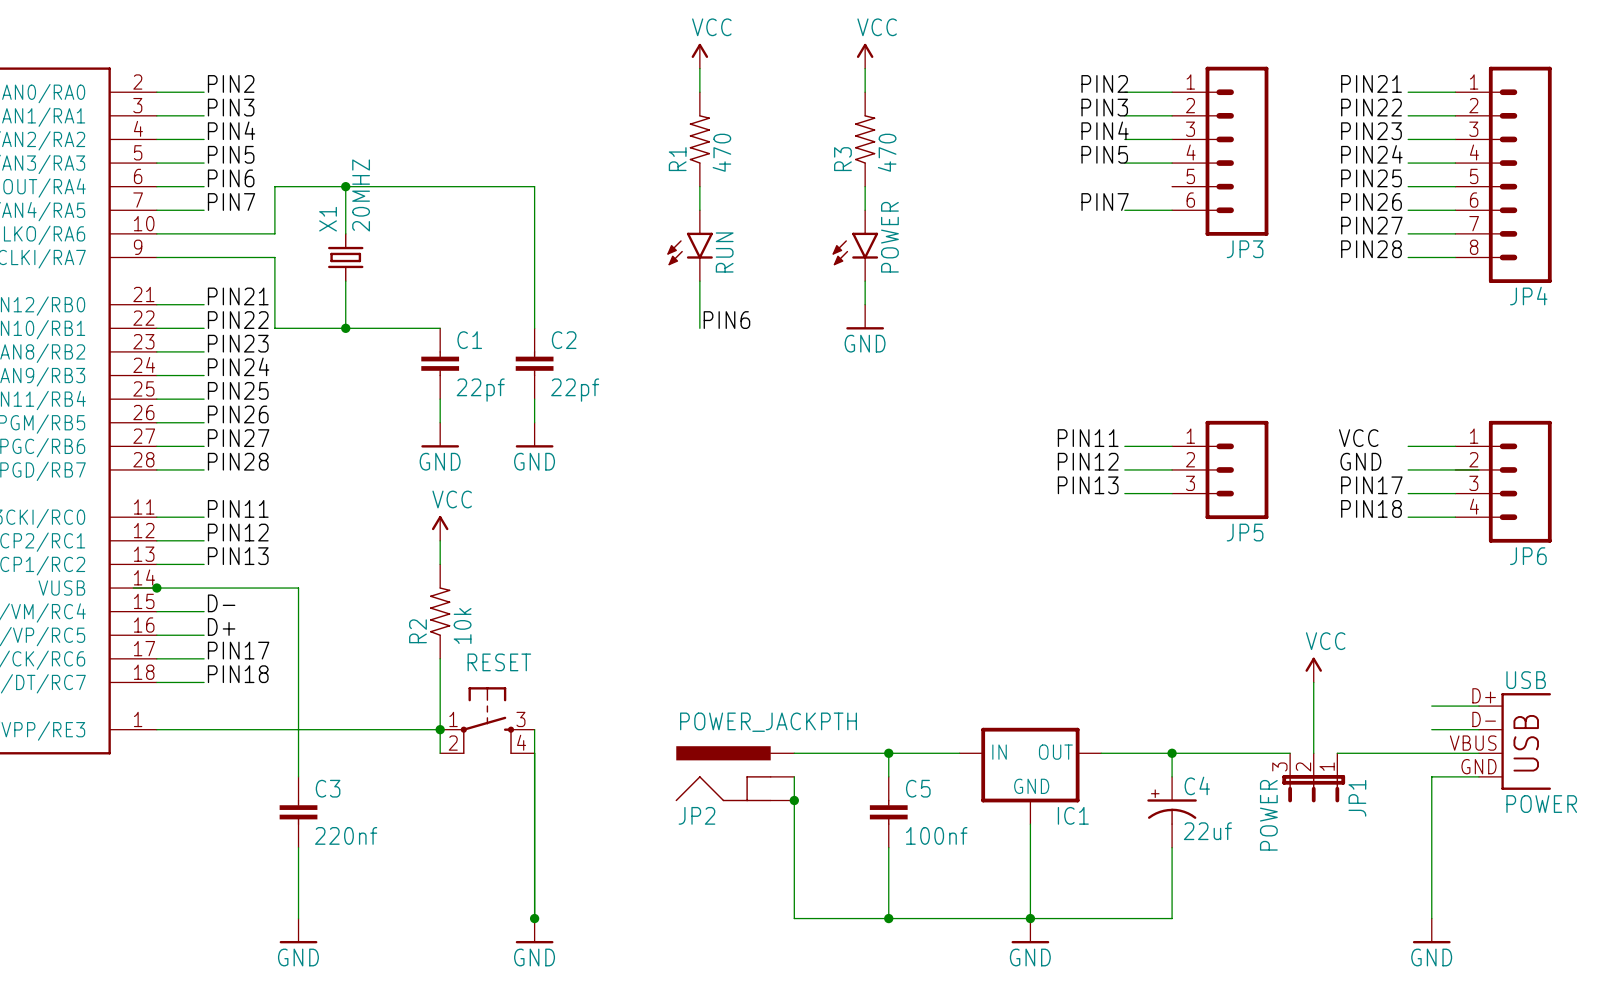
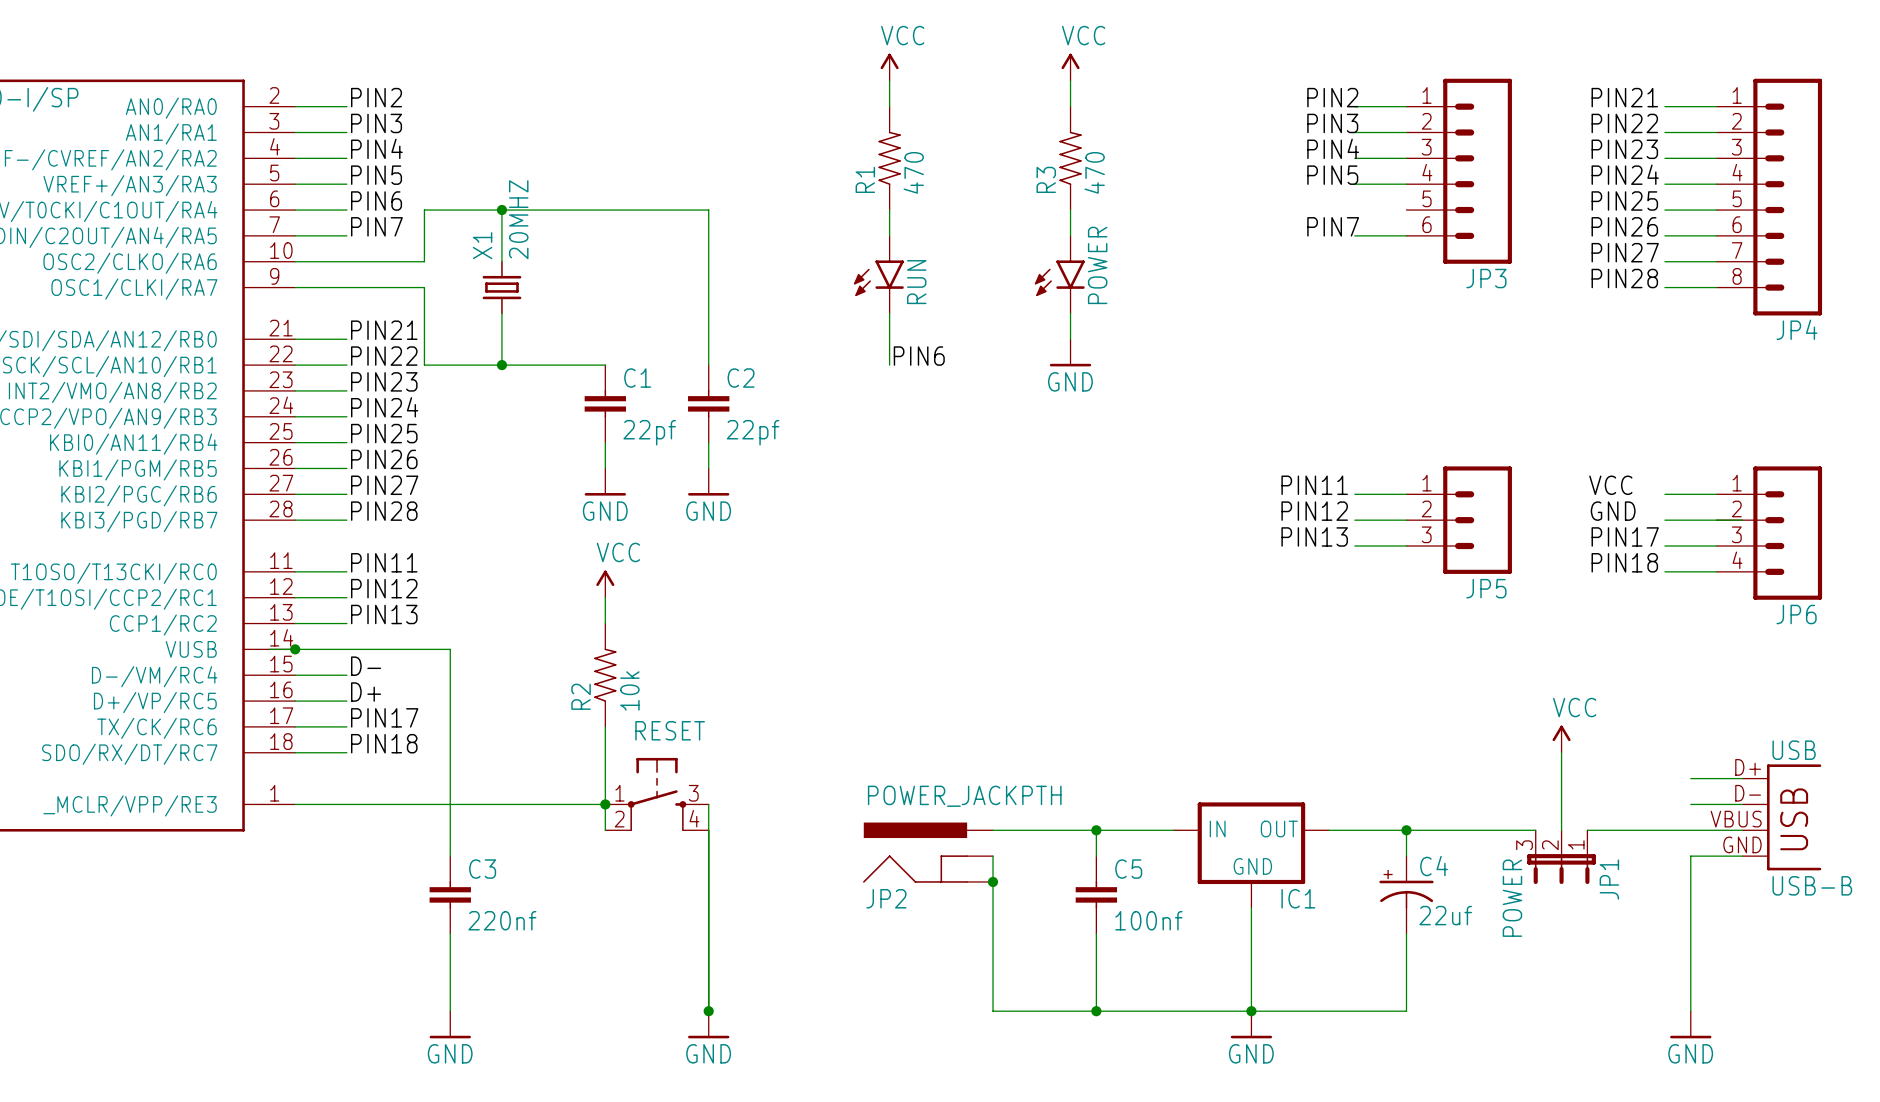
USB value: POWER (1541, 804) -> USB-B (1812, 885)

